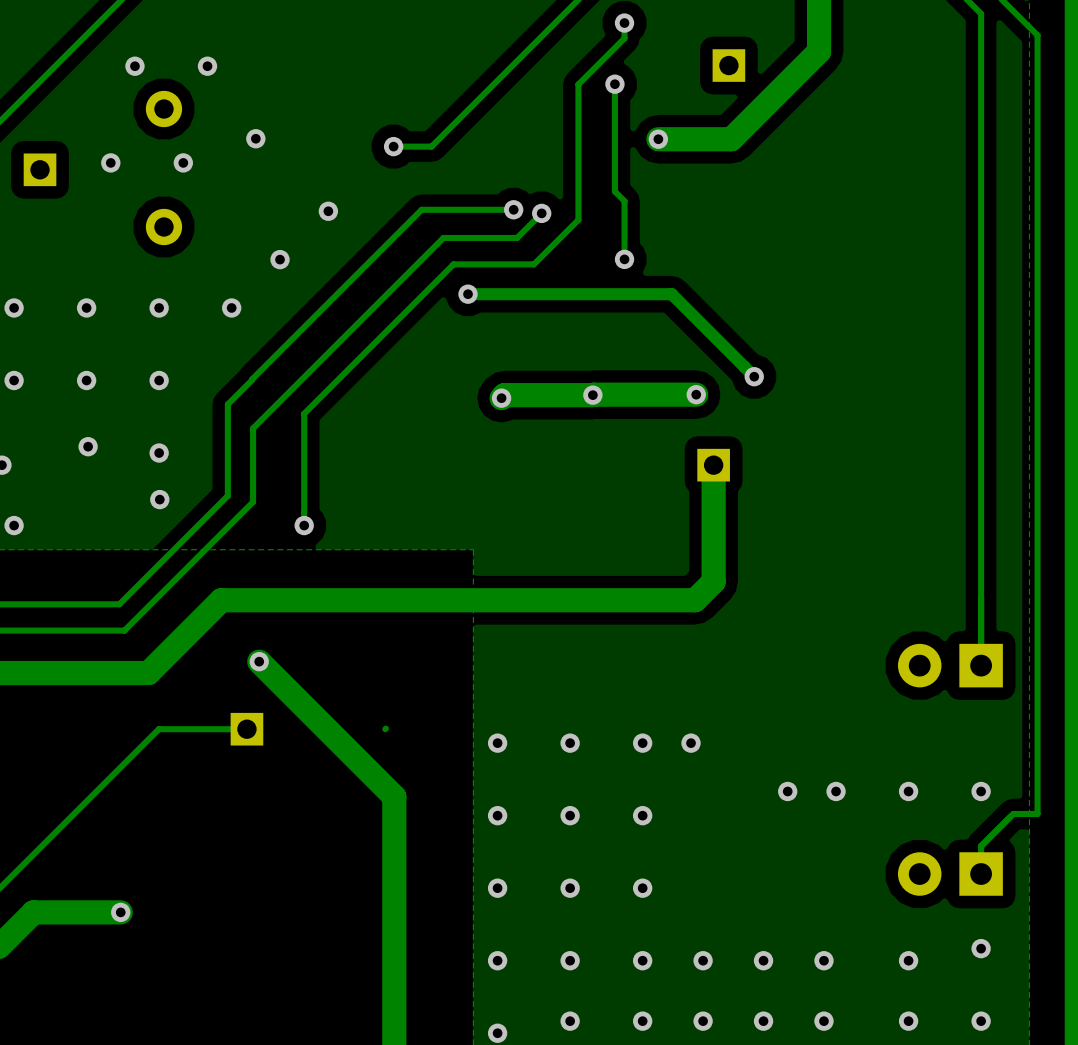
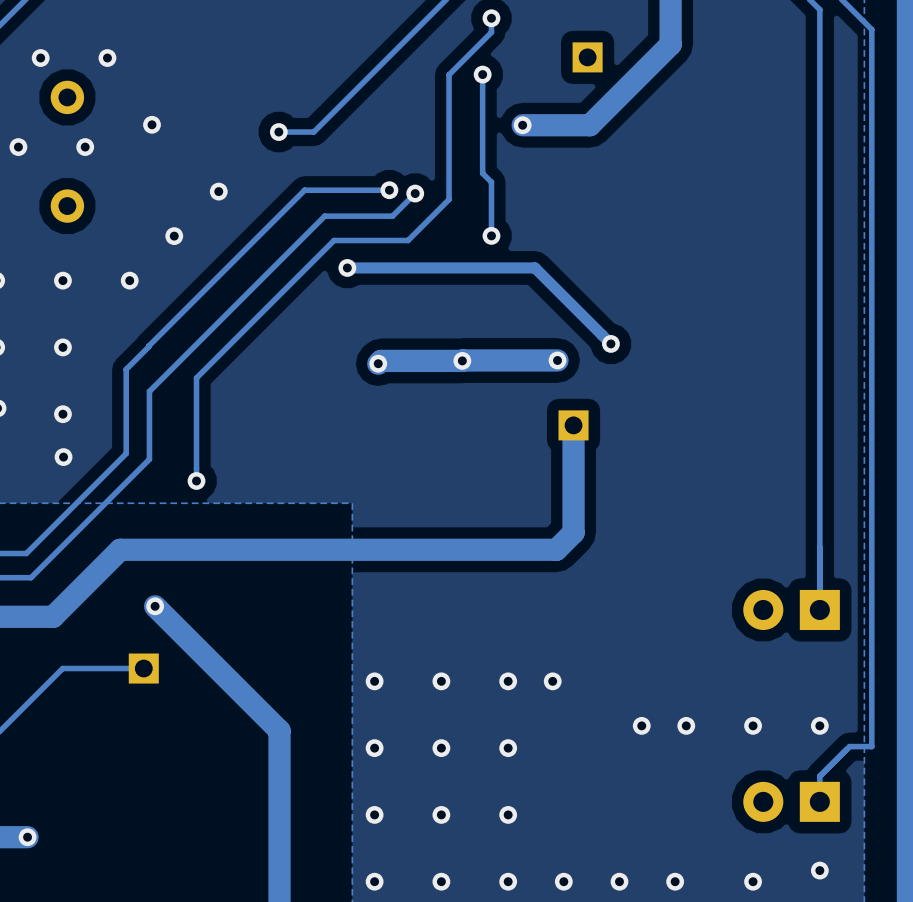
track: (385, 728) (385, 729) -> none

